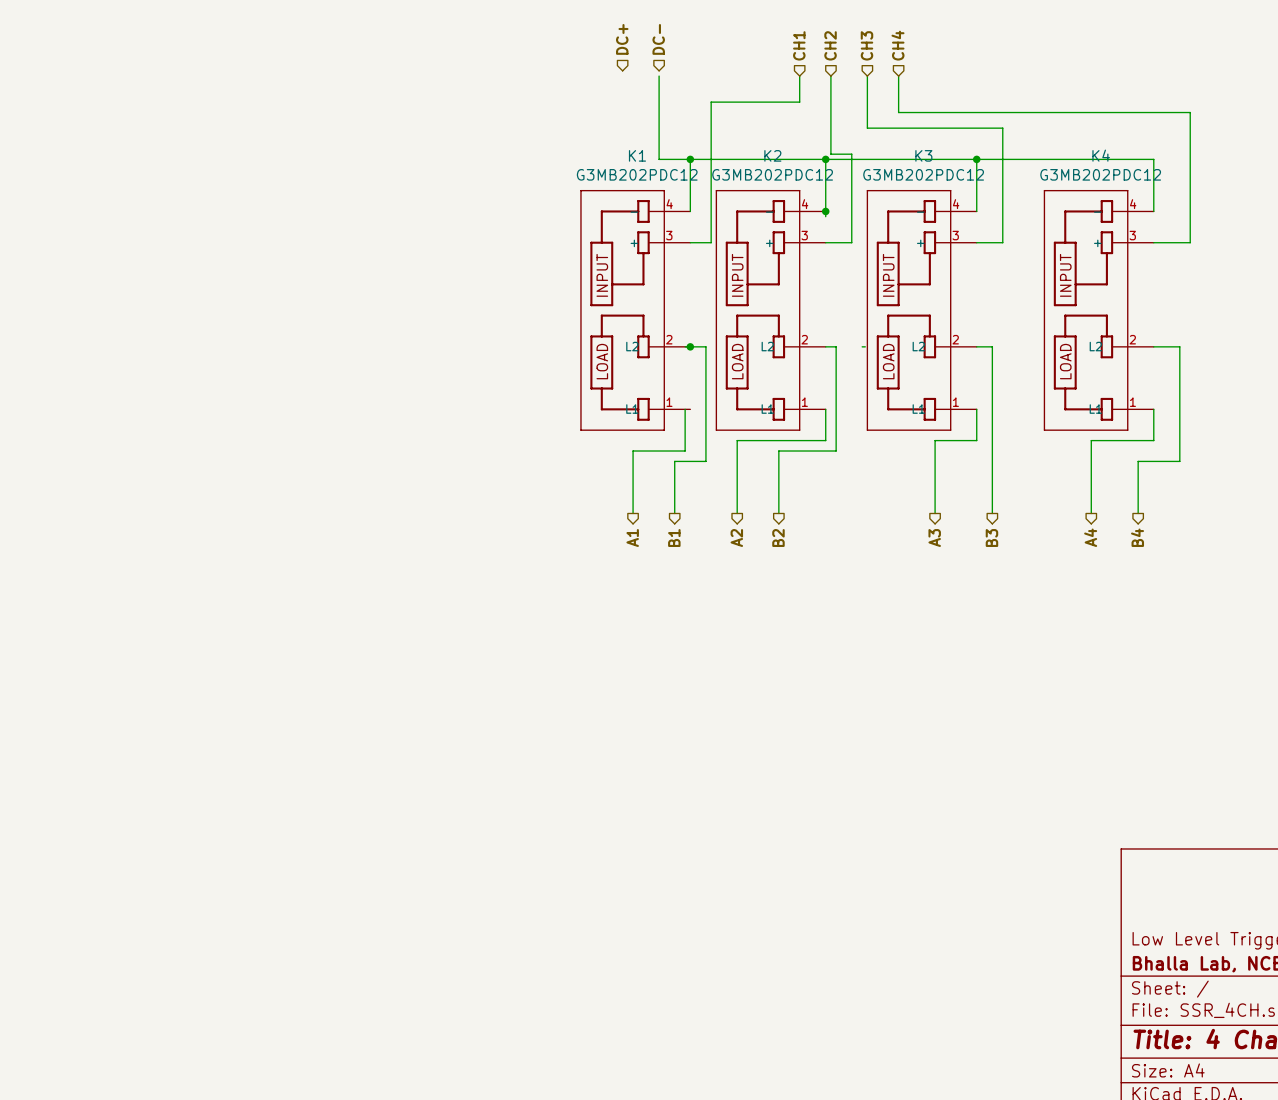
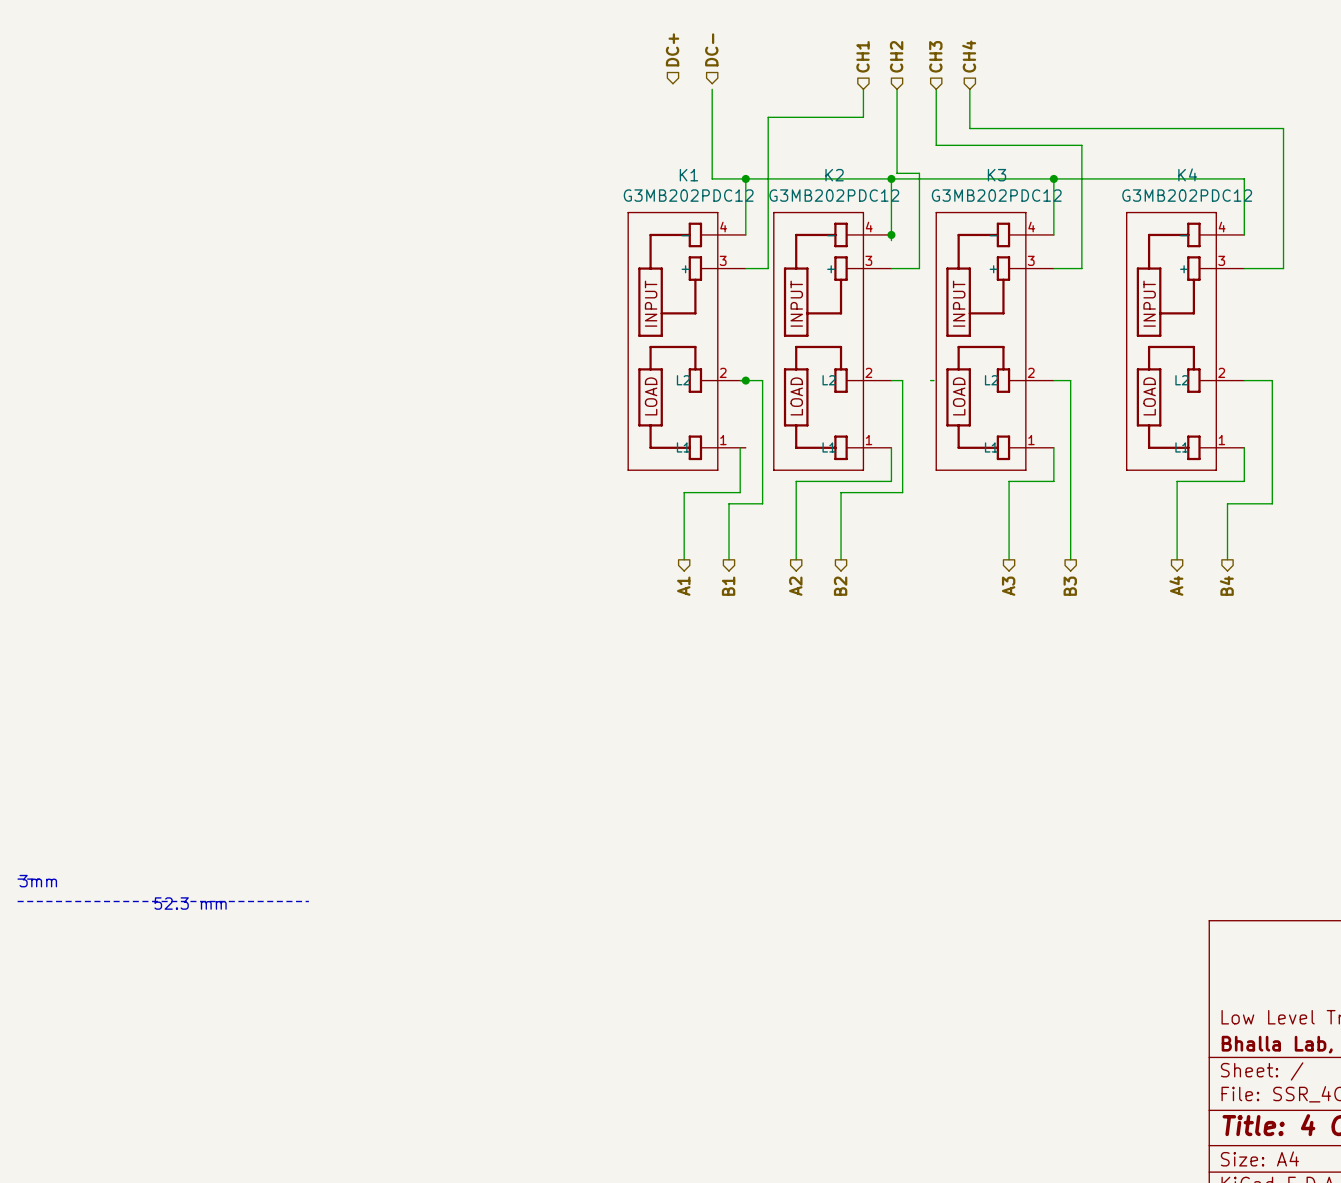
line: none -> (17, 879) (40, 879)
text: none -> 3mm (38, 881)
line: none -> (17, 901) (308, 901)
text: none -> 52.3 mm (190, 903)

